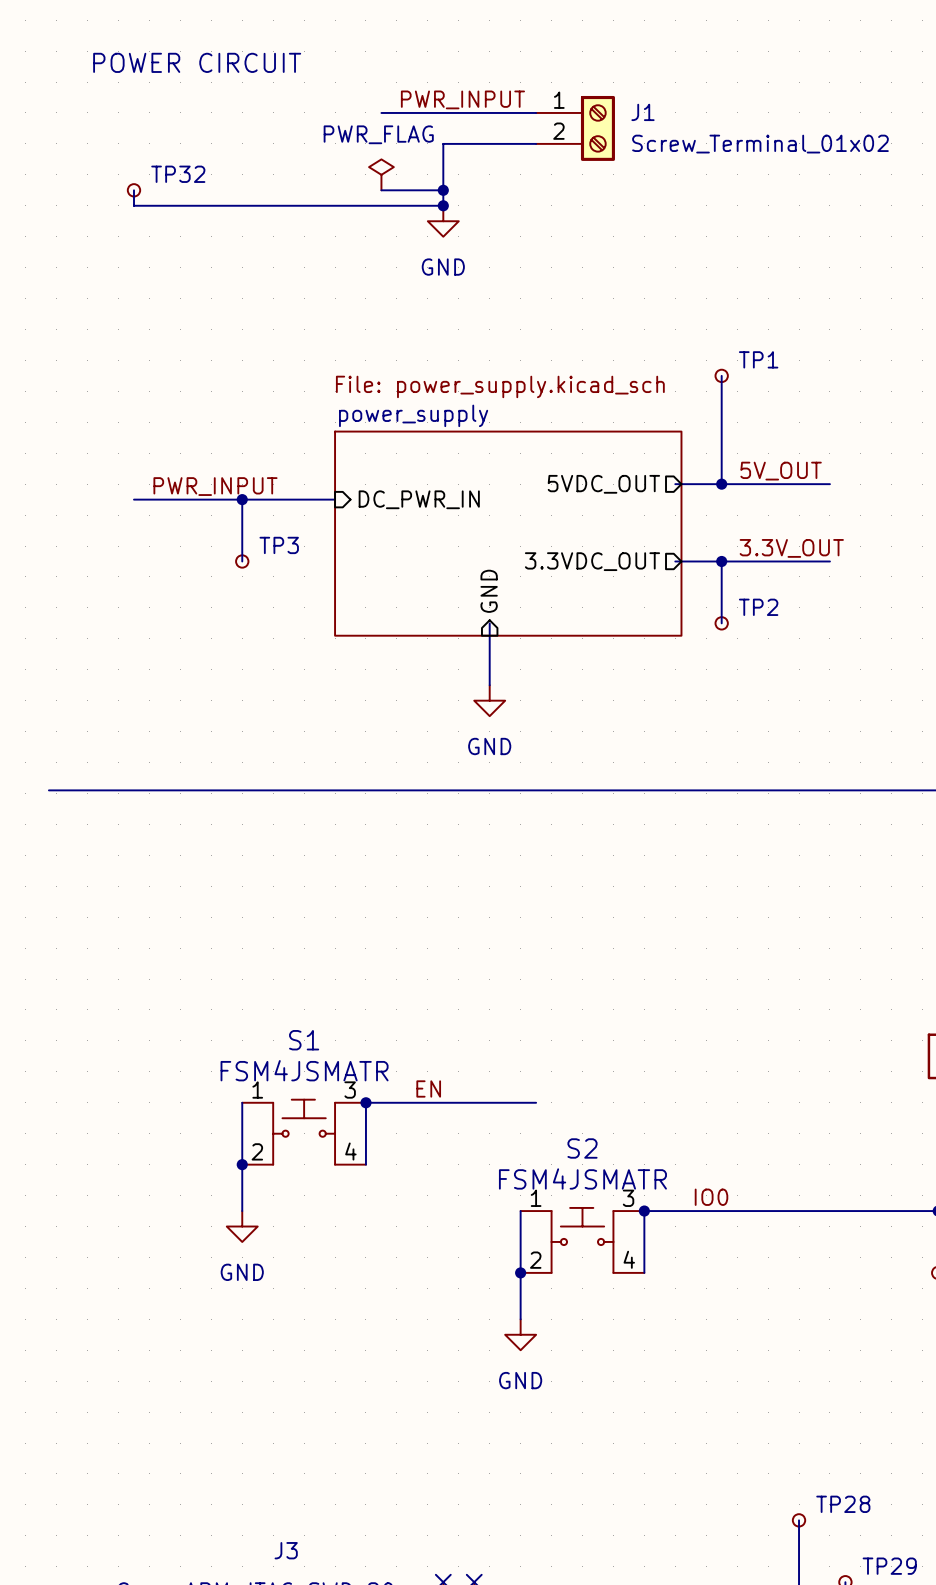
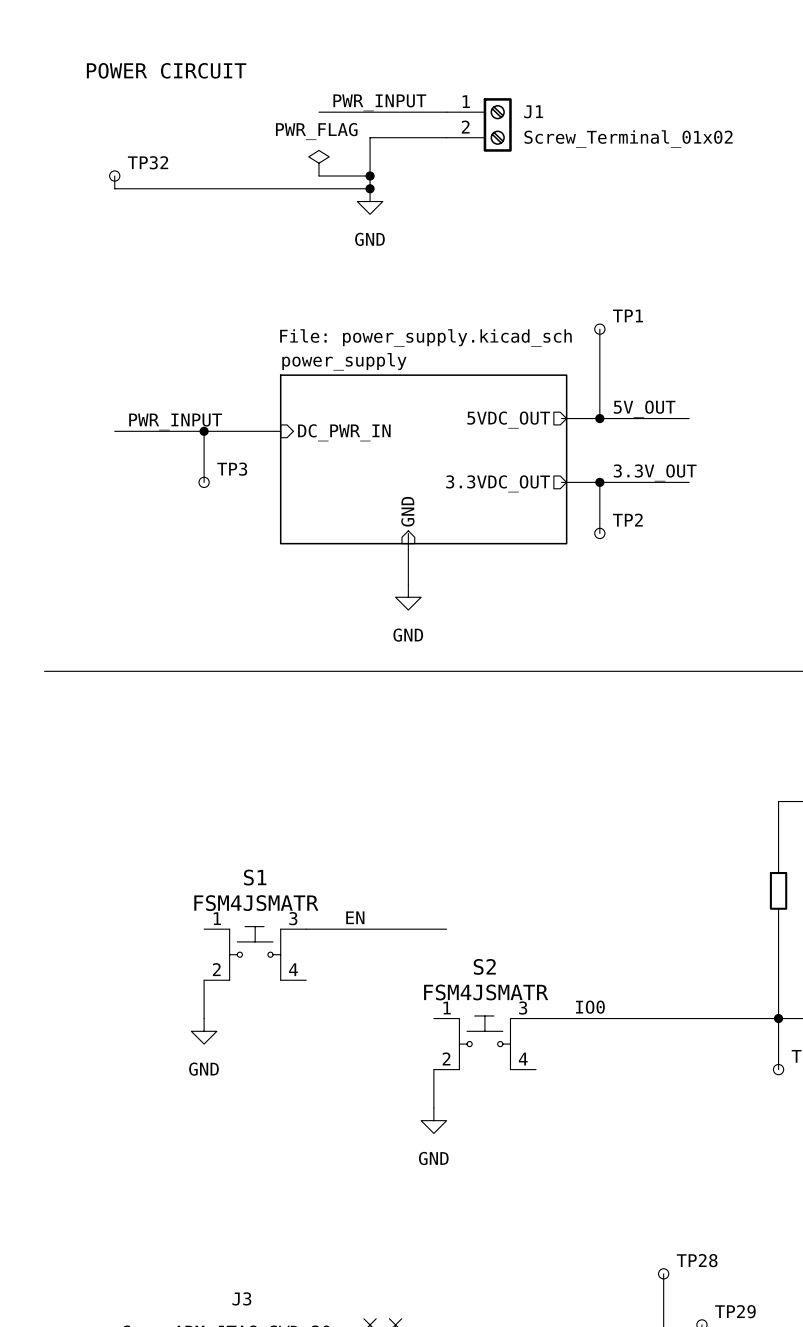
wire: (242, 1102) (242, 1164) -> none
wire: (365, 1102) (365, 1164) -> none
junction: (365, 1102) -> none
junction: (242, 1164) -> none
wire: (520, 1211) (520, 1272) -> none
wire: (644, 1211) (644, 1272) -> none
junction: (644, 1211) -> none
junction: (520, 1272) -> none

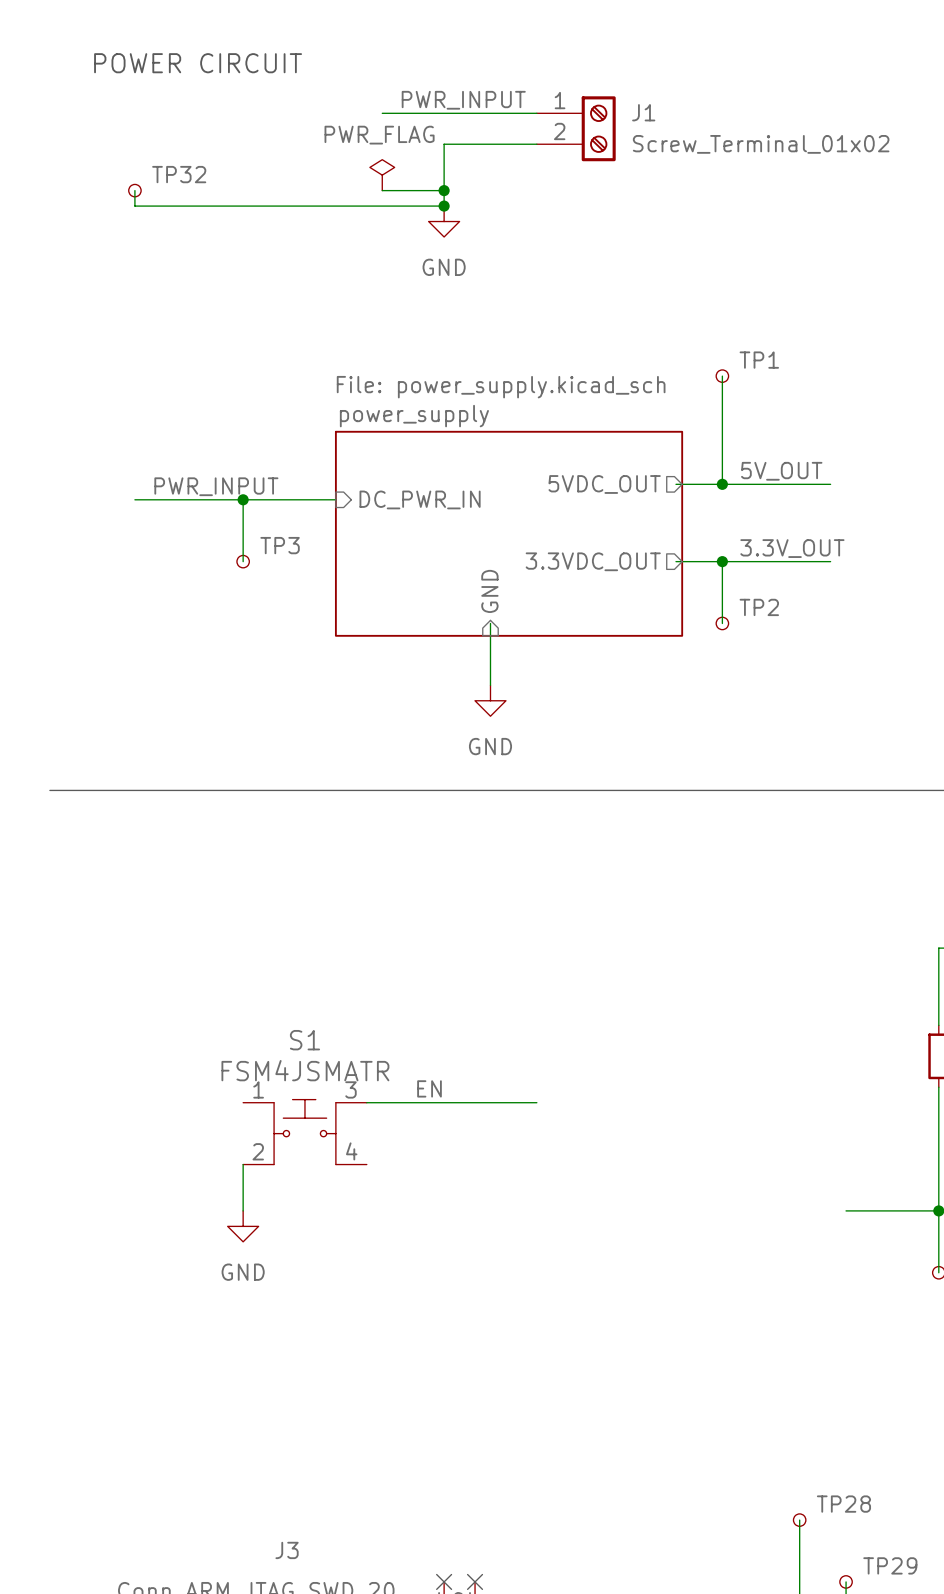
label: IO0 (590, 1007) -> none
wire: (536, 1018) (701, 1018) -> none
S2: FSM4JSMATR (484, 1042) -> none
wire: (433, 1069) (433, 1107) -> none
power symbol: GND (433, 1120) -> none

